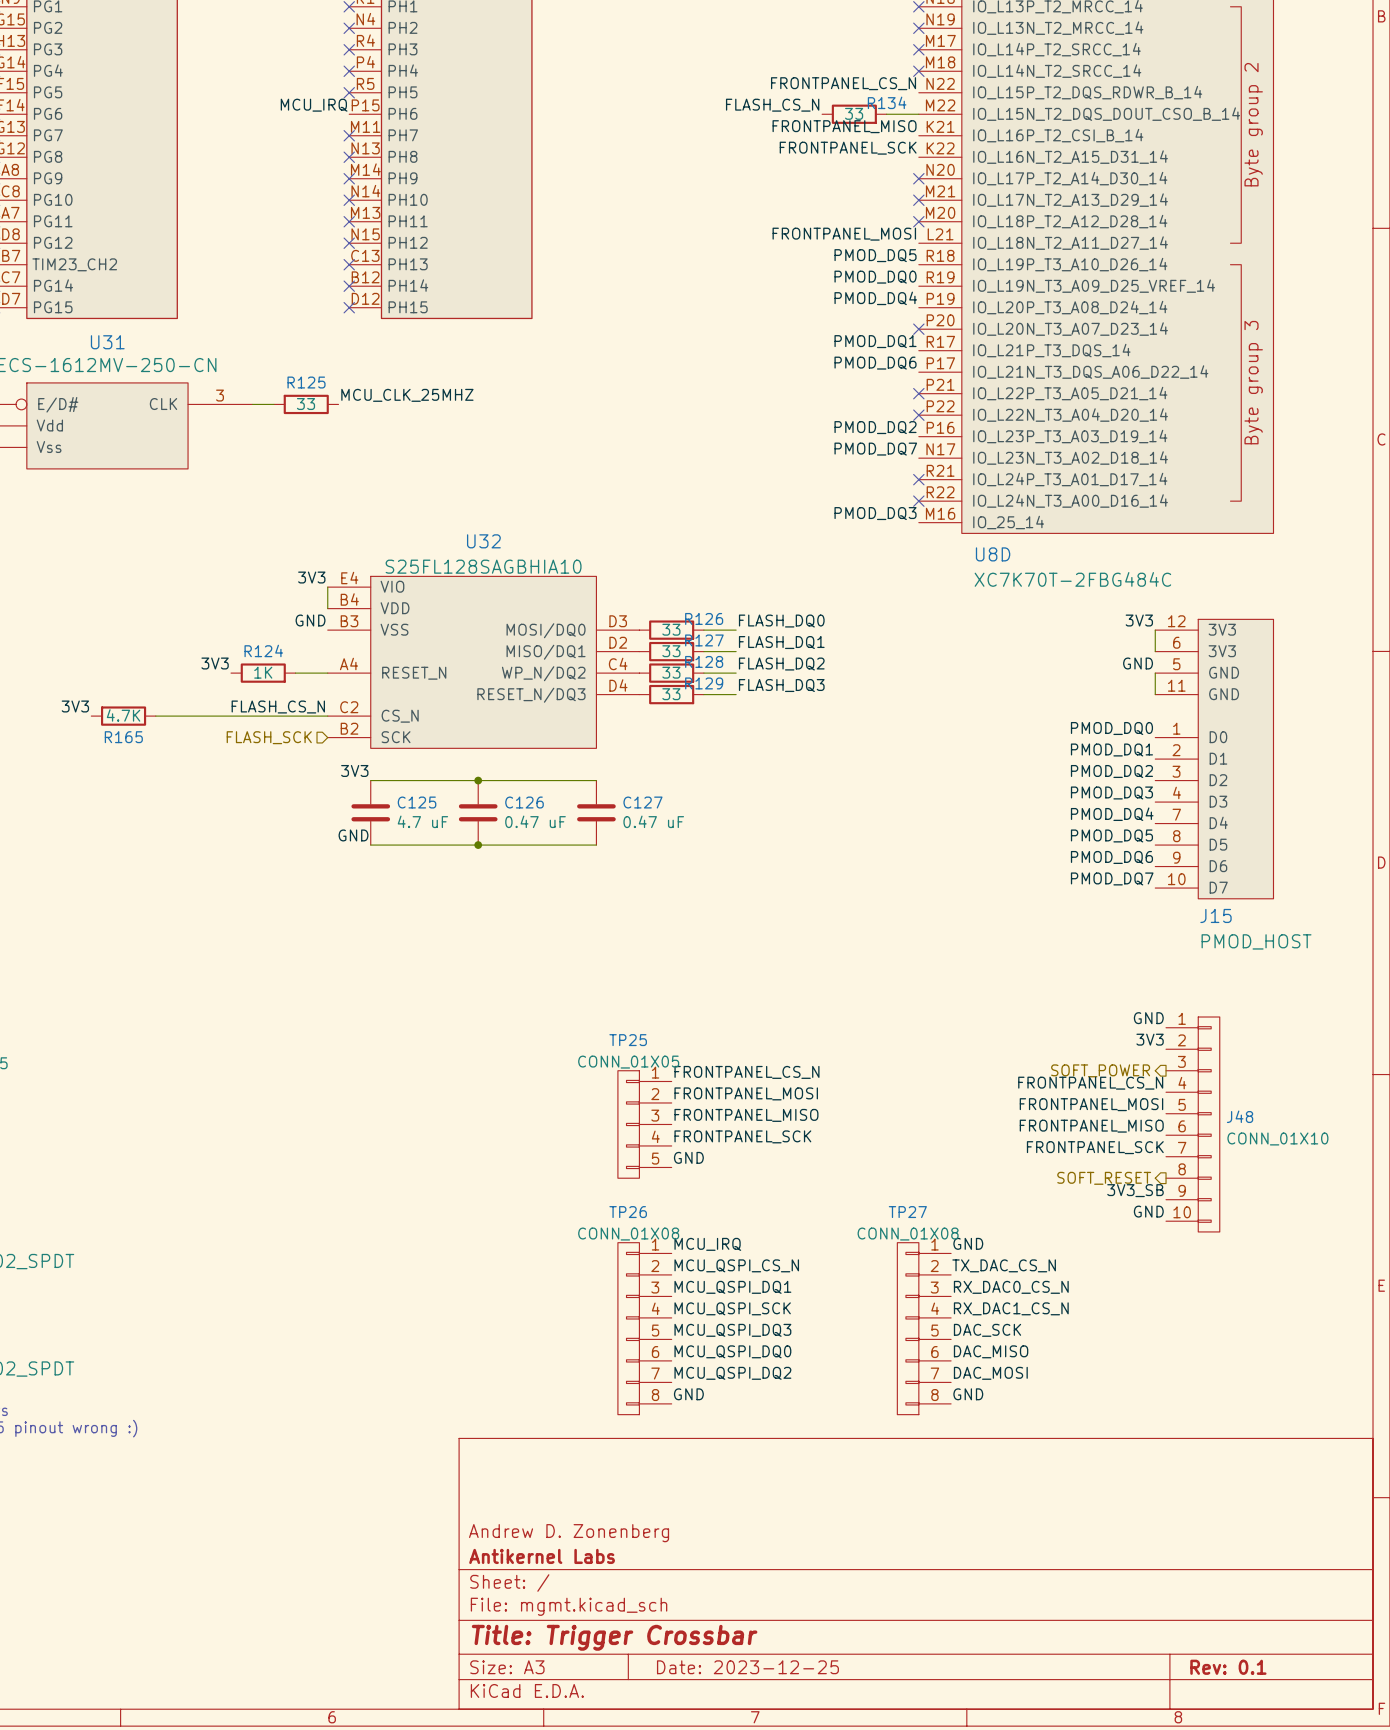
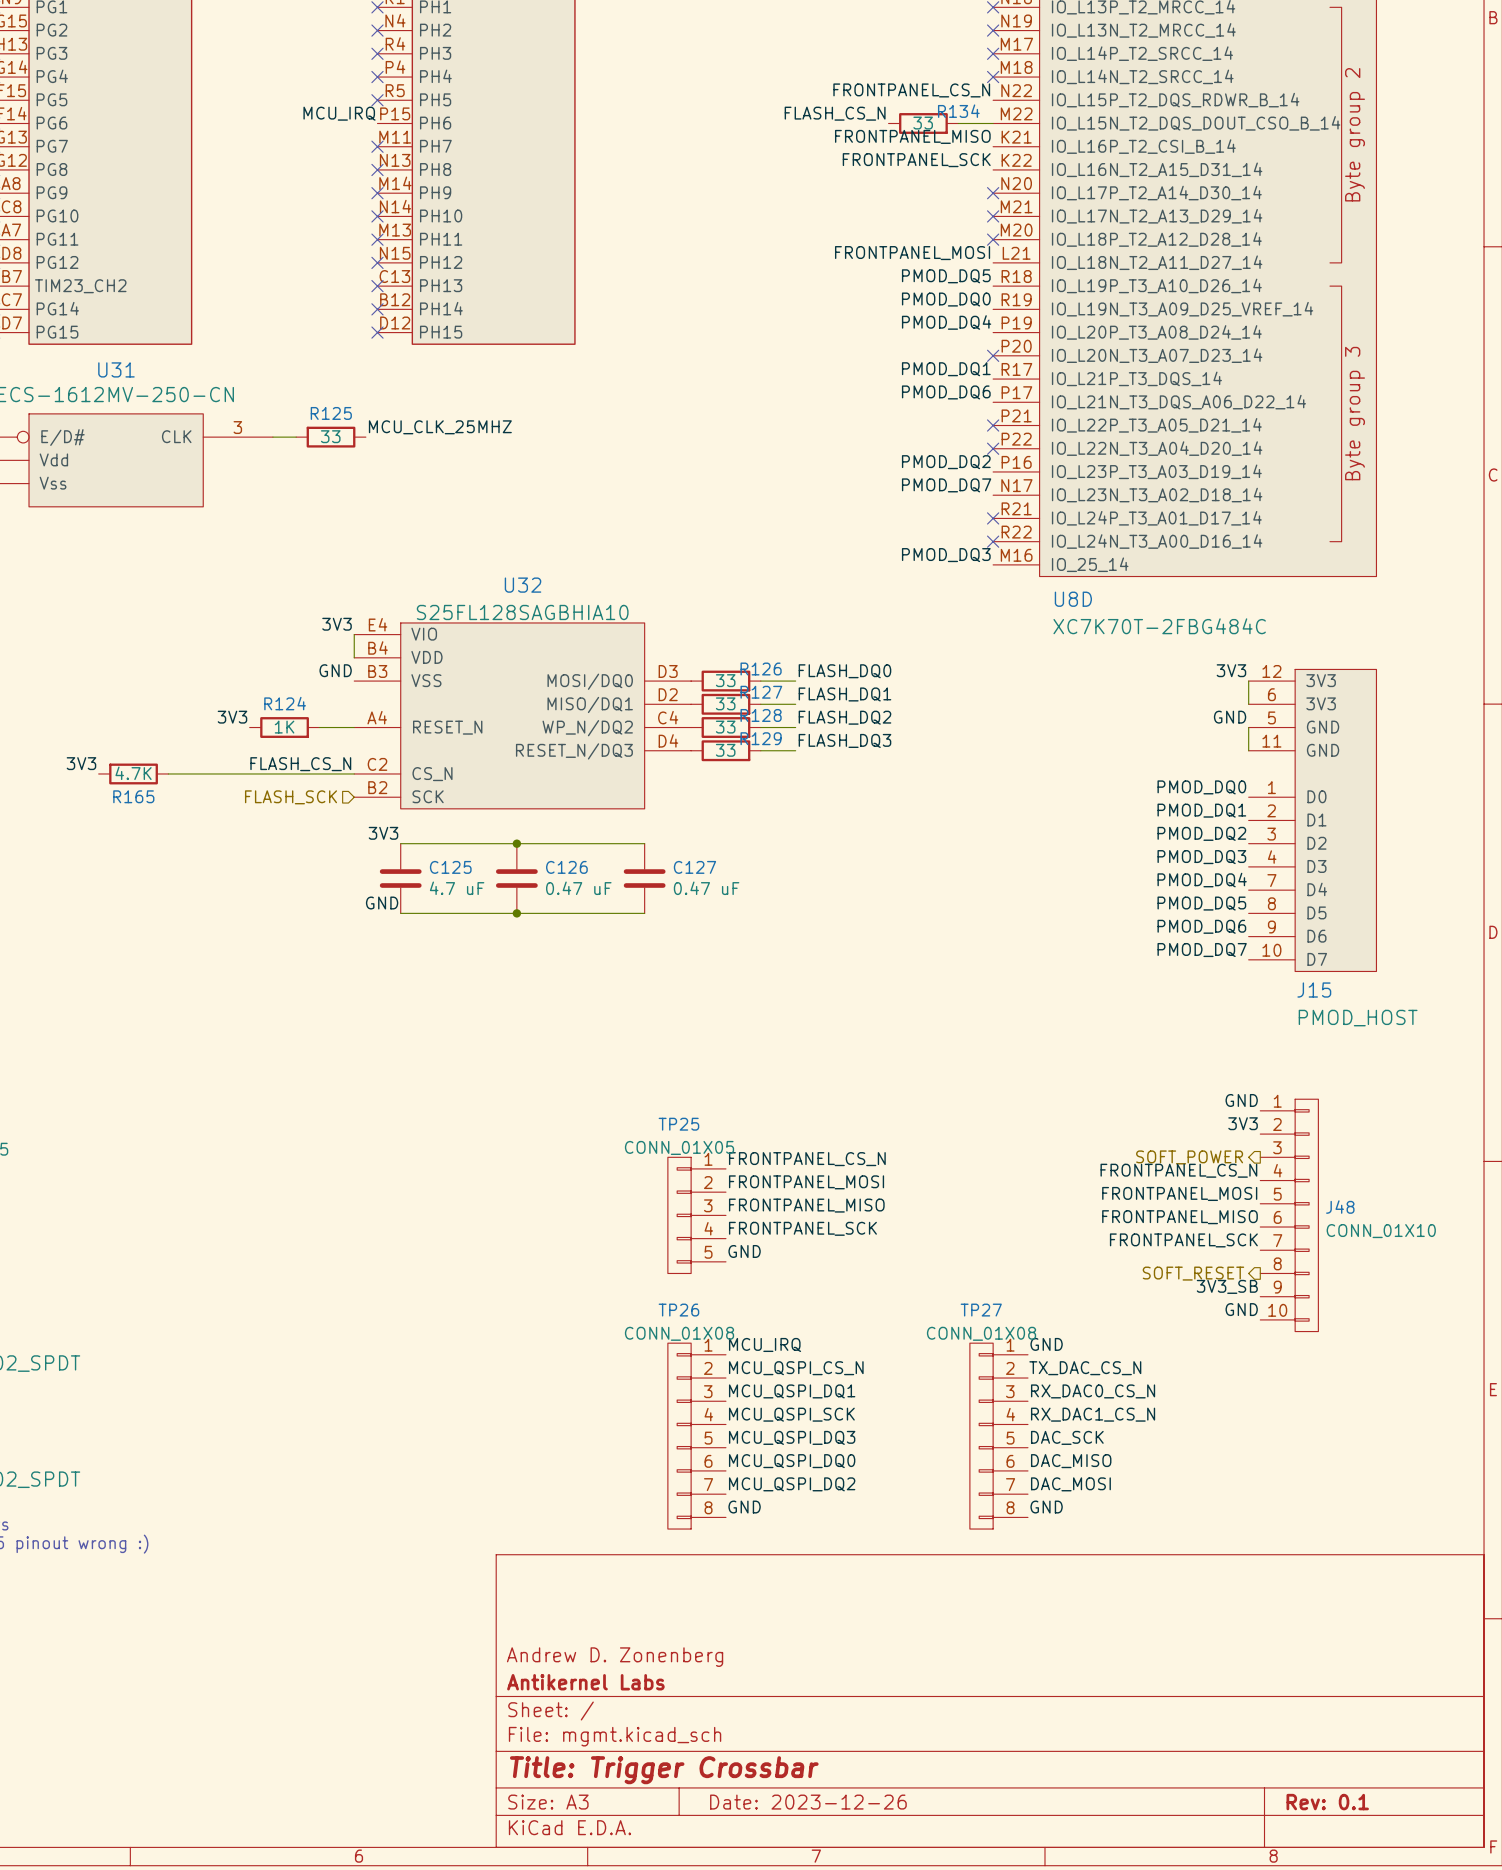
title block: Date: 2023-12-25 (747, 1667) -> Date: 2023-12-26 (808, 1802)

